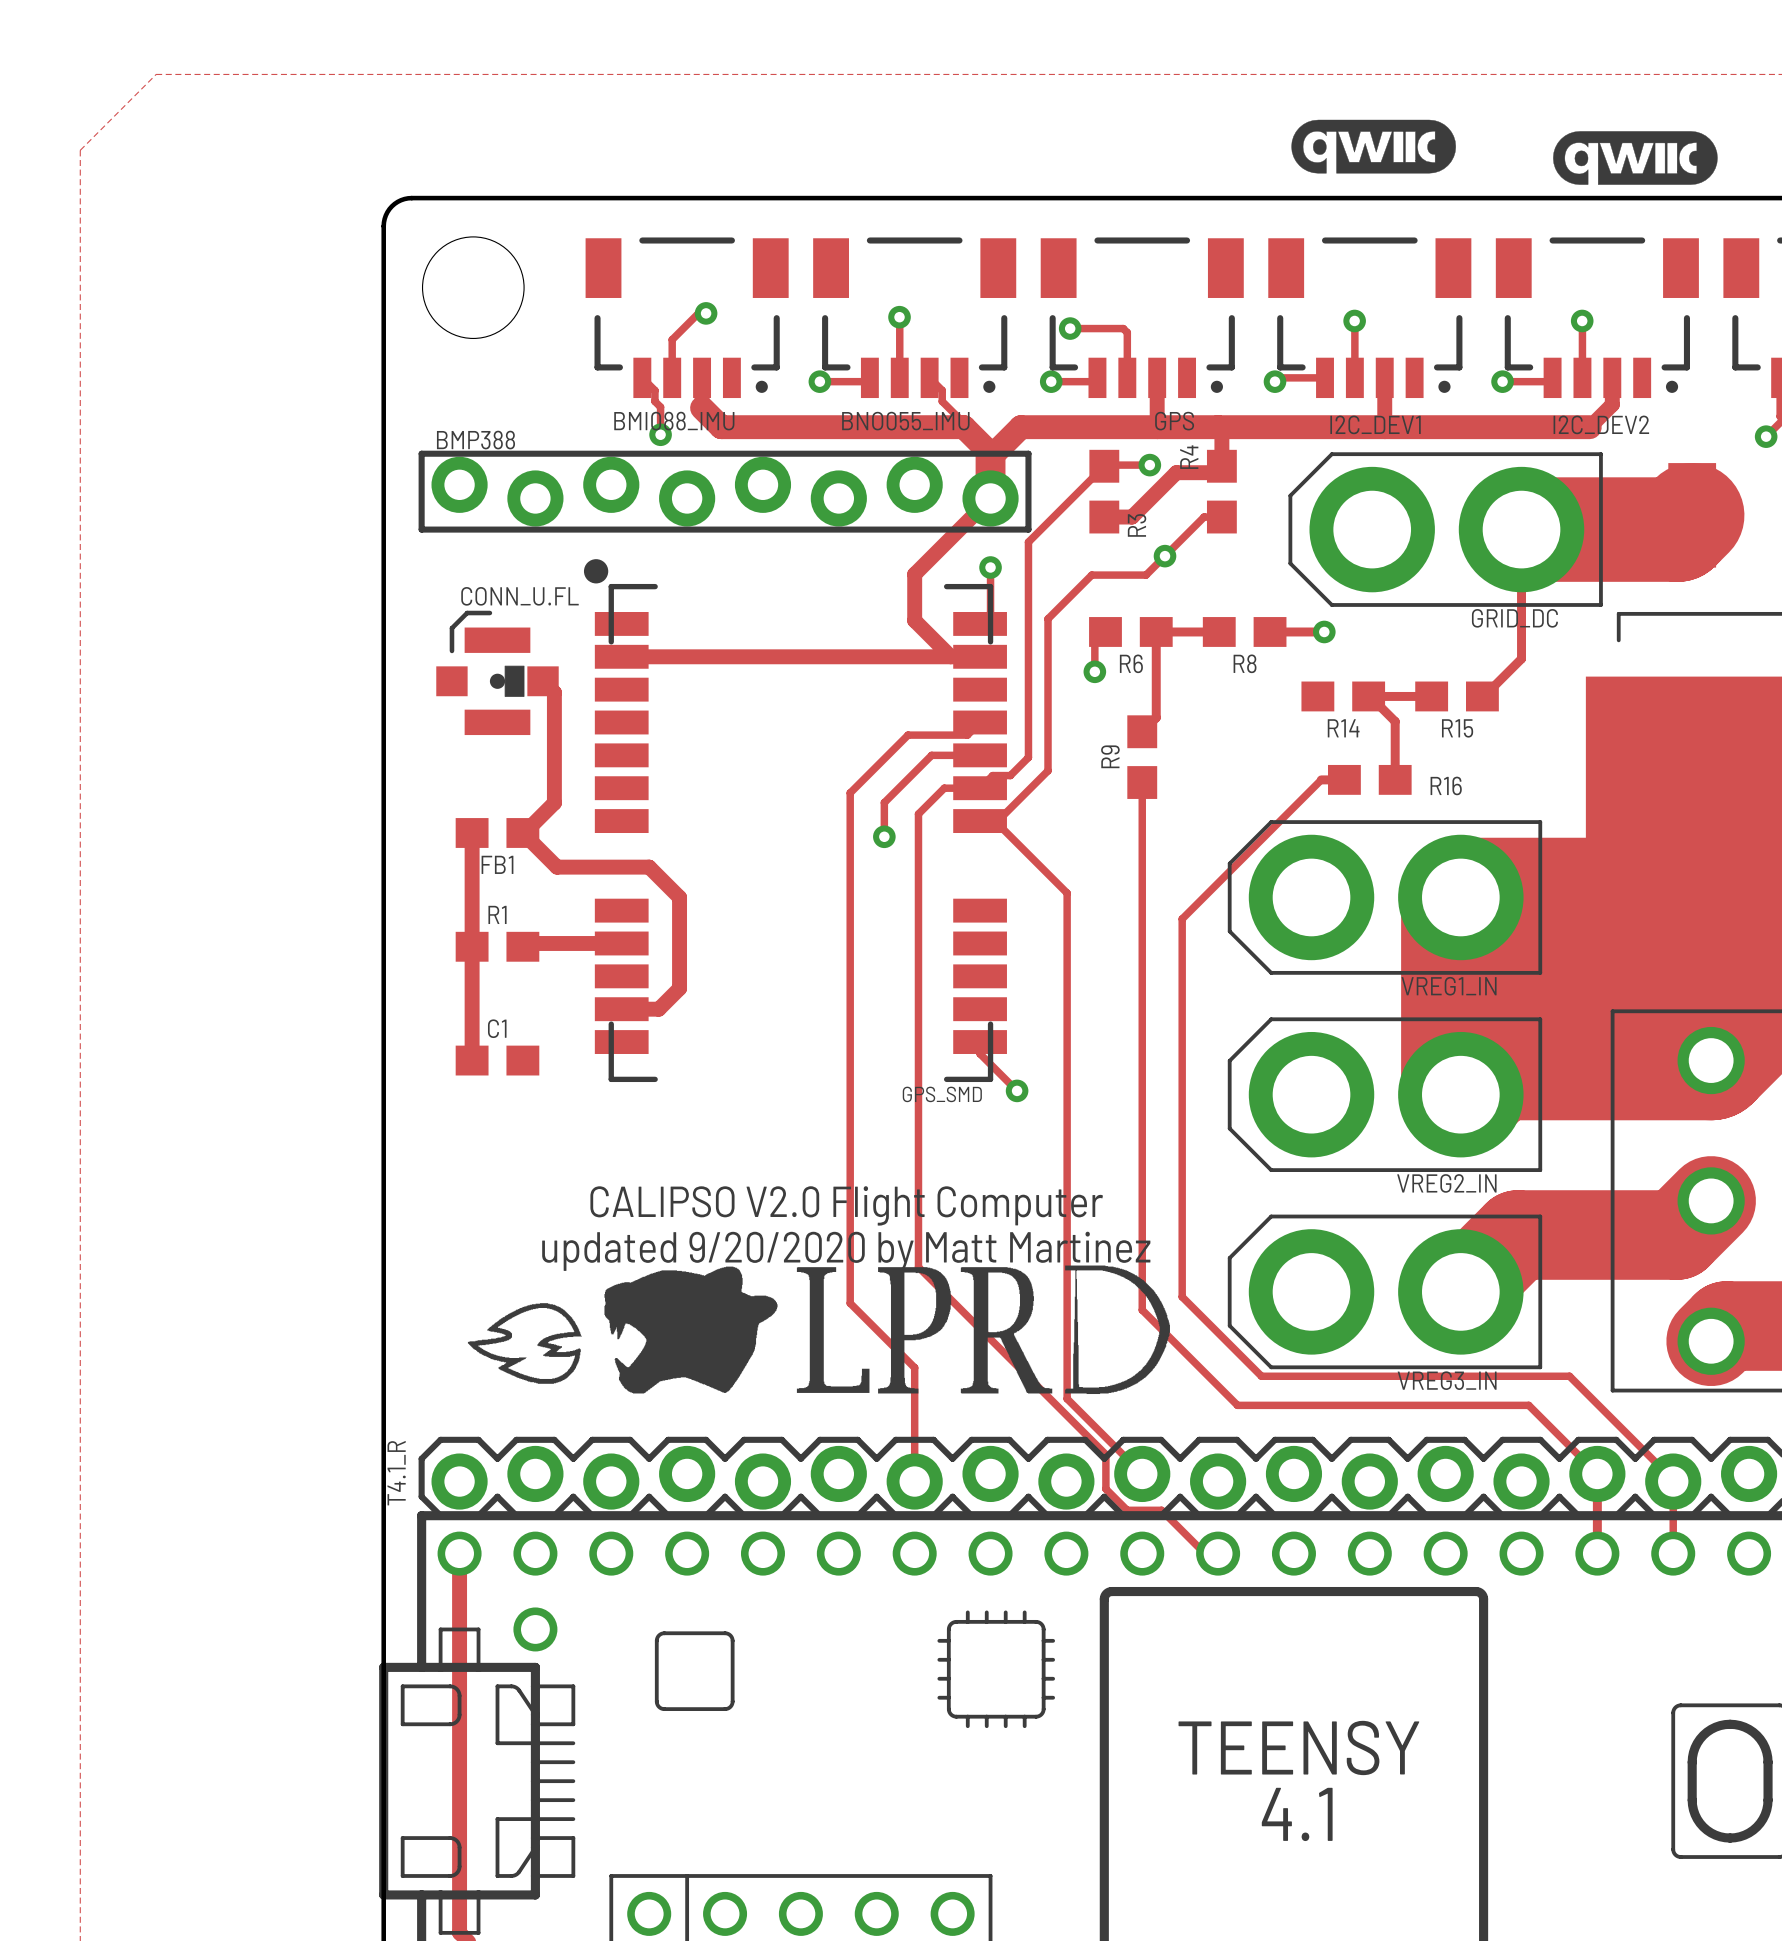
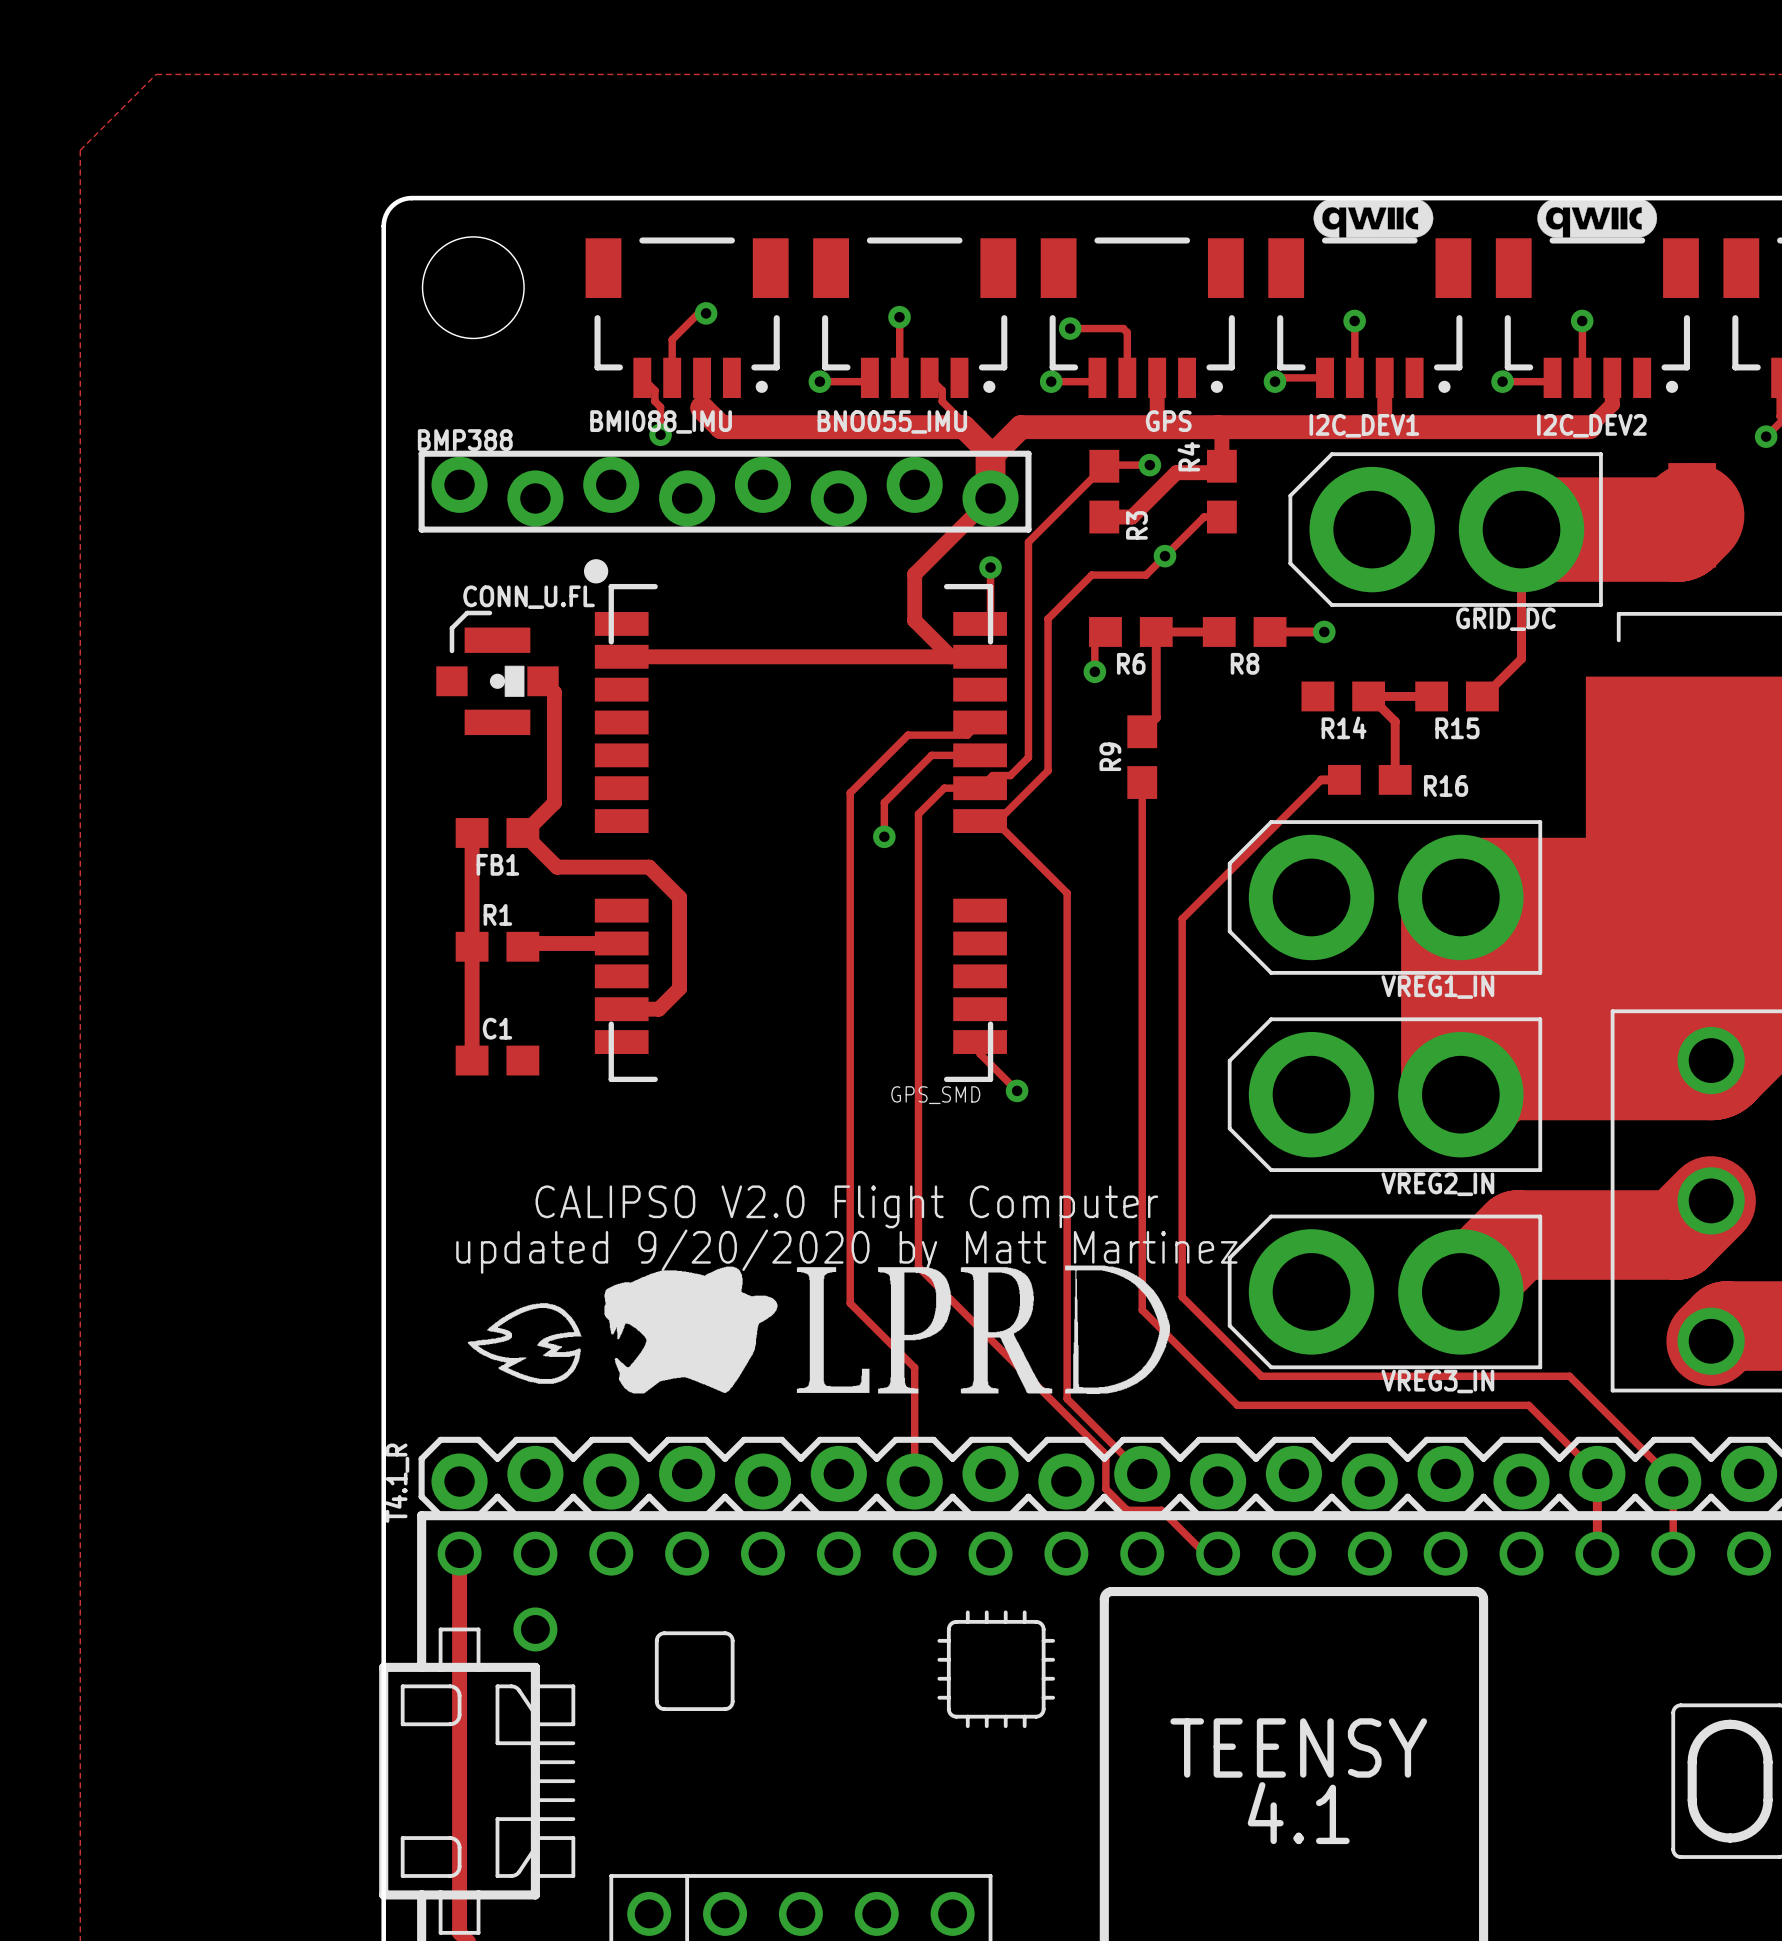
drawing: [1291, 119, 1456, 174] -> none
drawing: [1553, 131, 1718, 185] -> none
drawing: none -> [1313, 198, 1434, 238]
drawing: none -> [1537, 198, 1658, 238]

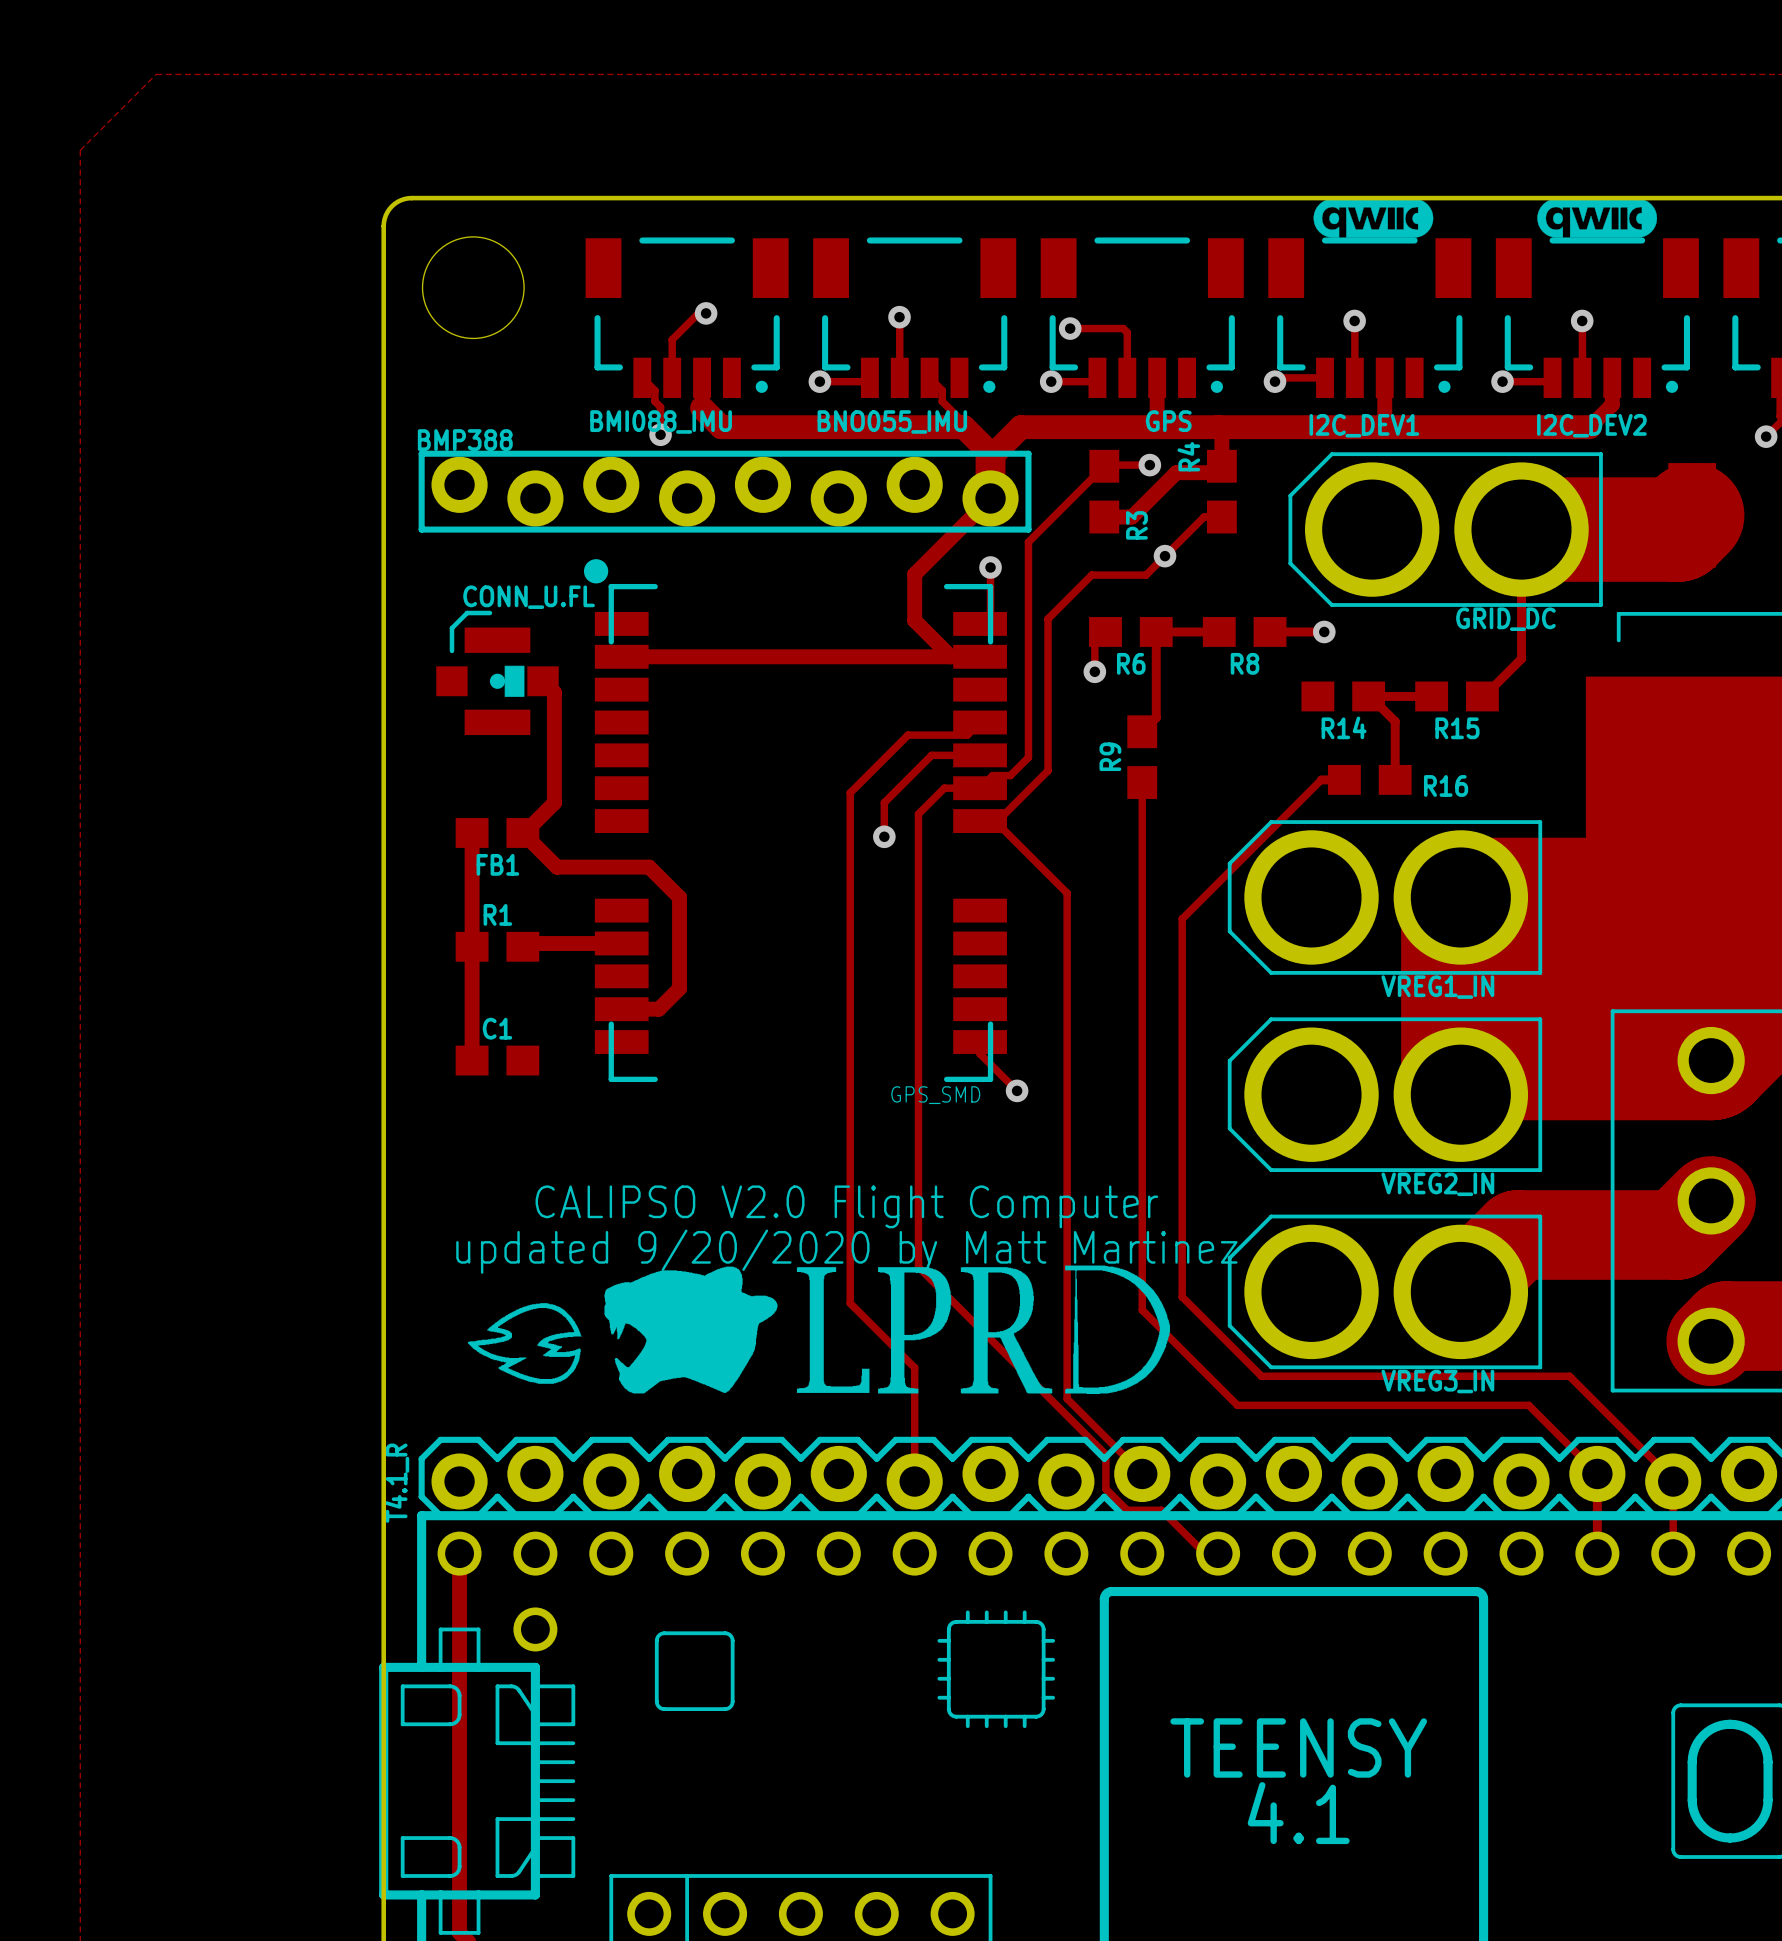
GRID_DC footprint: [1288, 452, 1603, 607] -> [1288, 452, 1603, 607]
VREG1_IN footprint: [1227, 820, 1543, 975] -> [1227, 820, 1543, 975]
VREG2_IN footprint: [1227, 1017, 1543, 1172] -> [1227, 1017, 1543, 1172]
VREG3_IN footprint: [1227, 1214, 1543, 1370] -> [1227, 1214, 1543, 1370]

